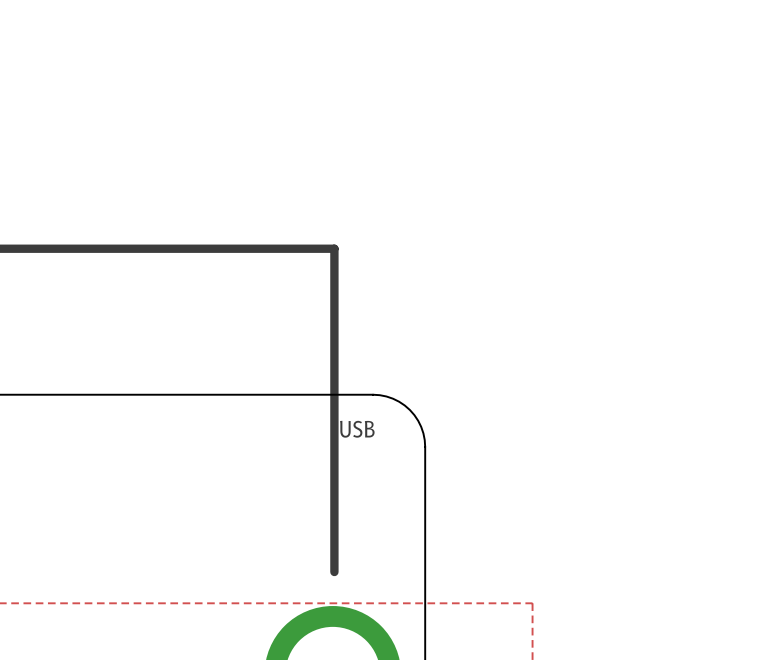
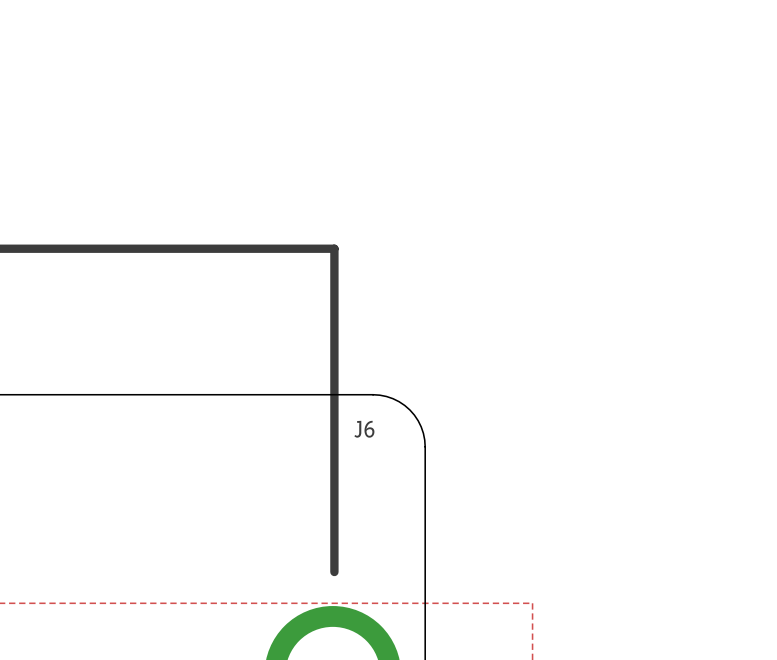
USB name: USB (357, 429) -> J6 (364, 429)

